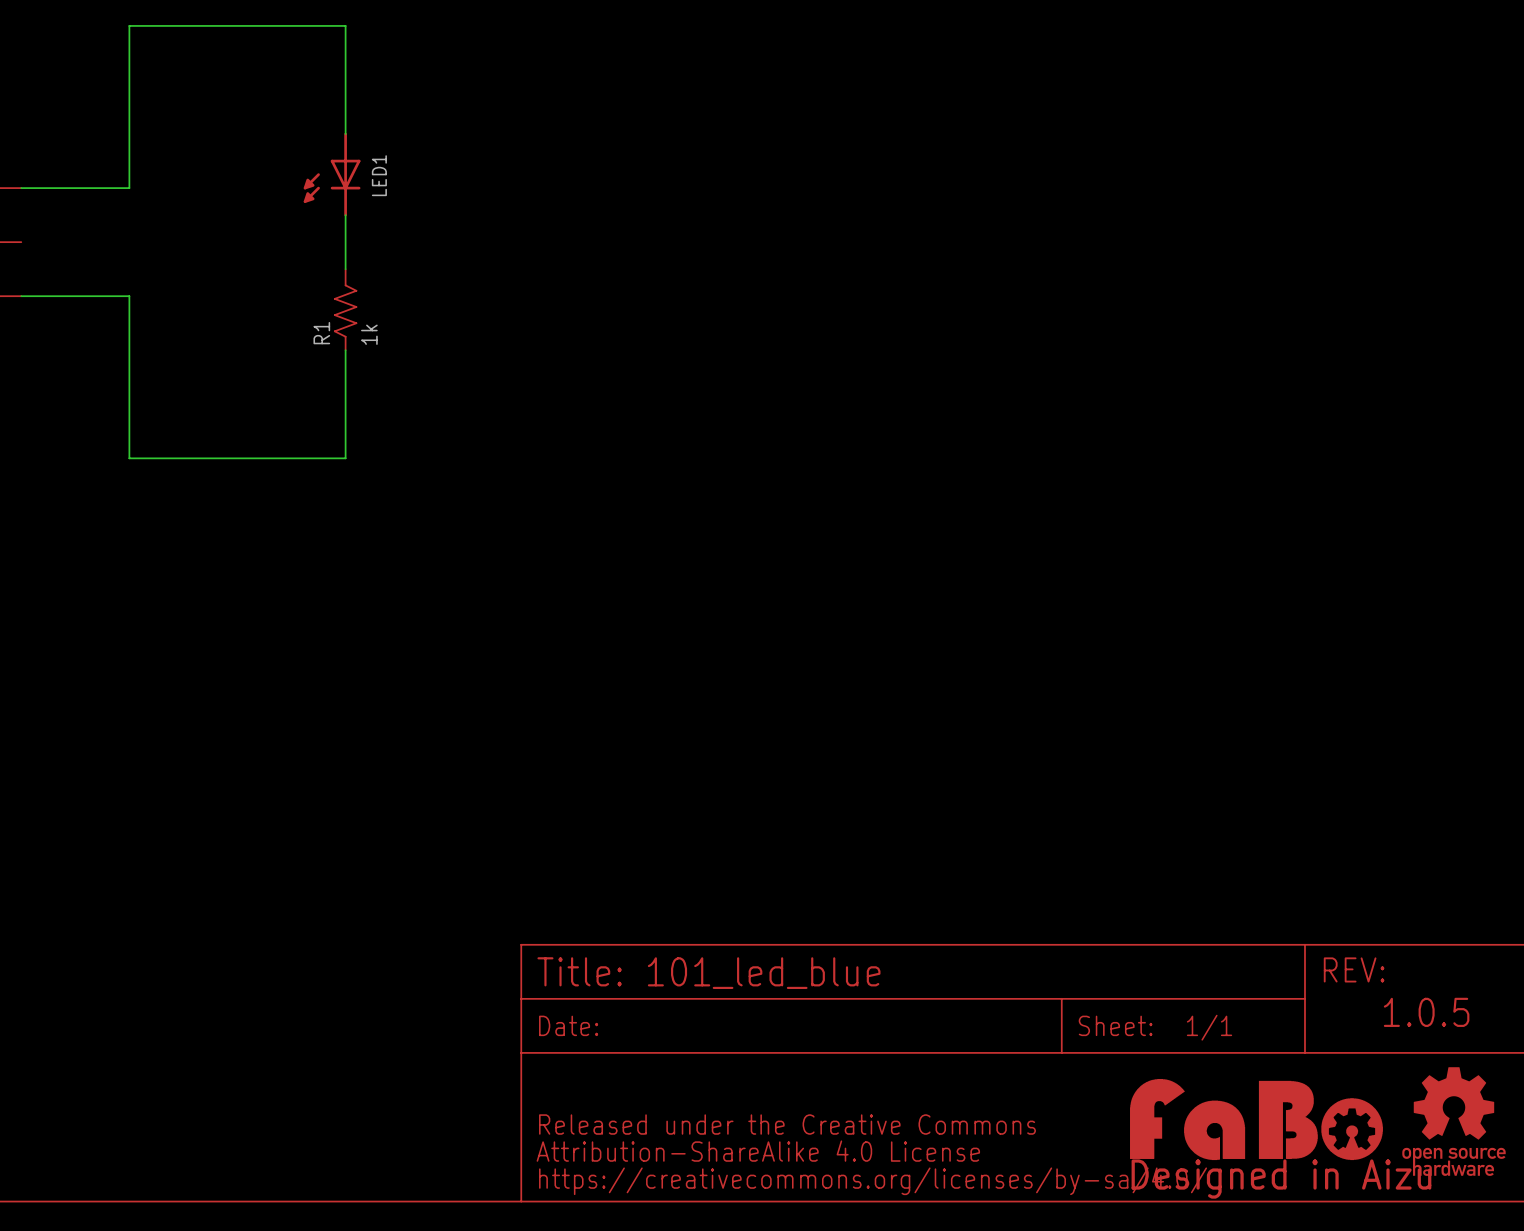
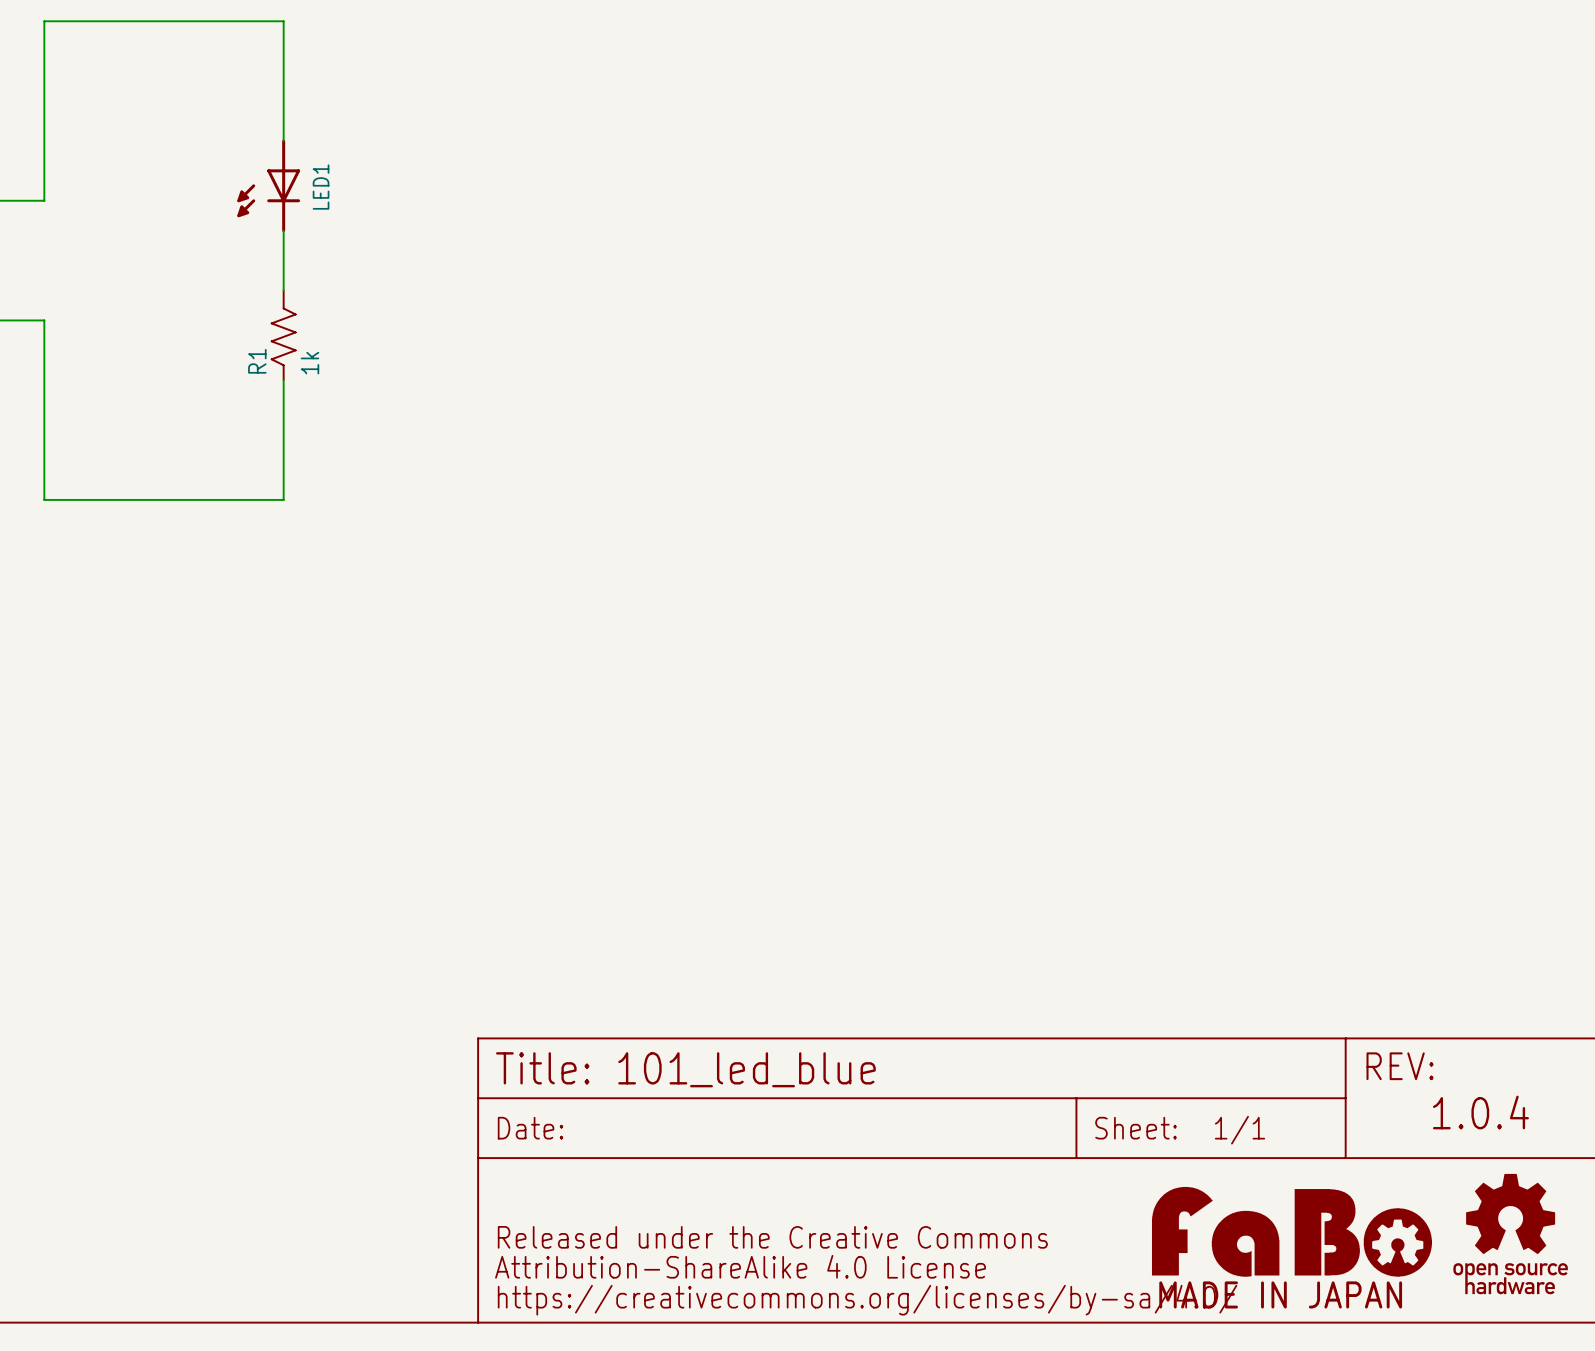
text: 1.0.5 (1426, 1012) -> 1.0.4 (1480, 1112)
part text: none -> MADE IN JAPAN (1280, 1294)
part text: Designed in Aizu (1281, 1179) -> none

